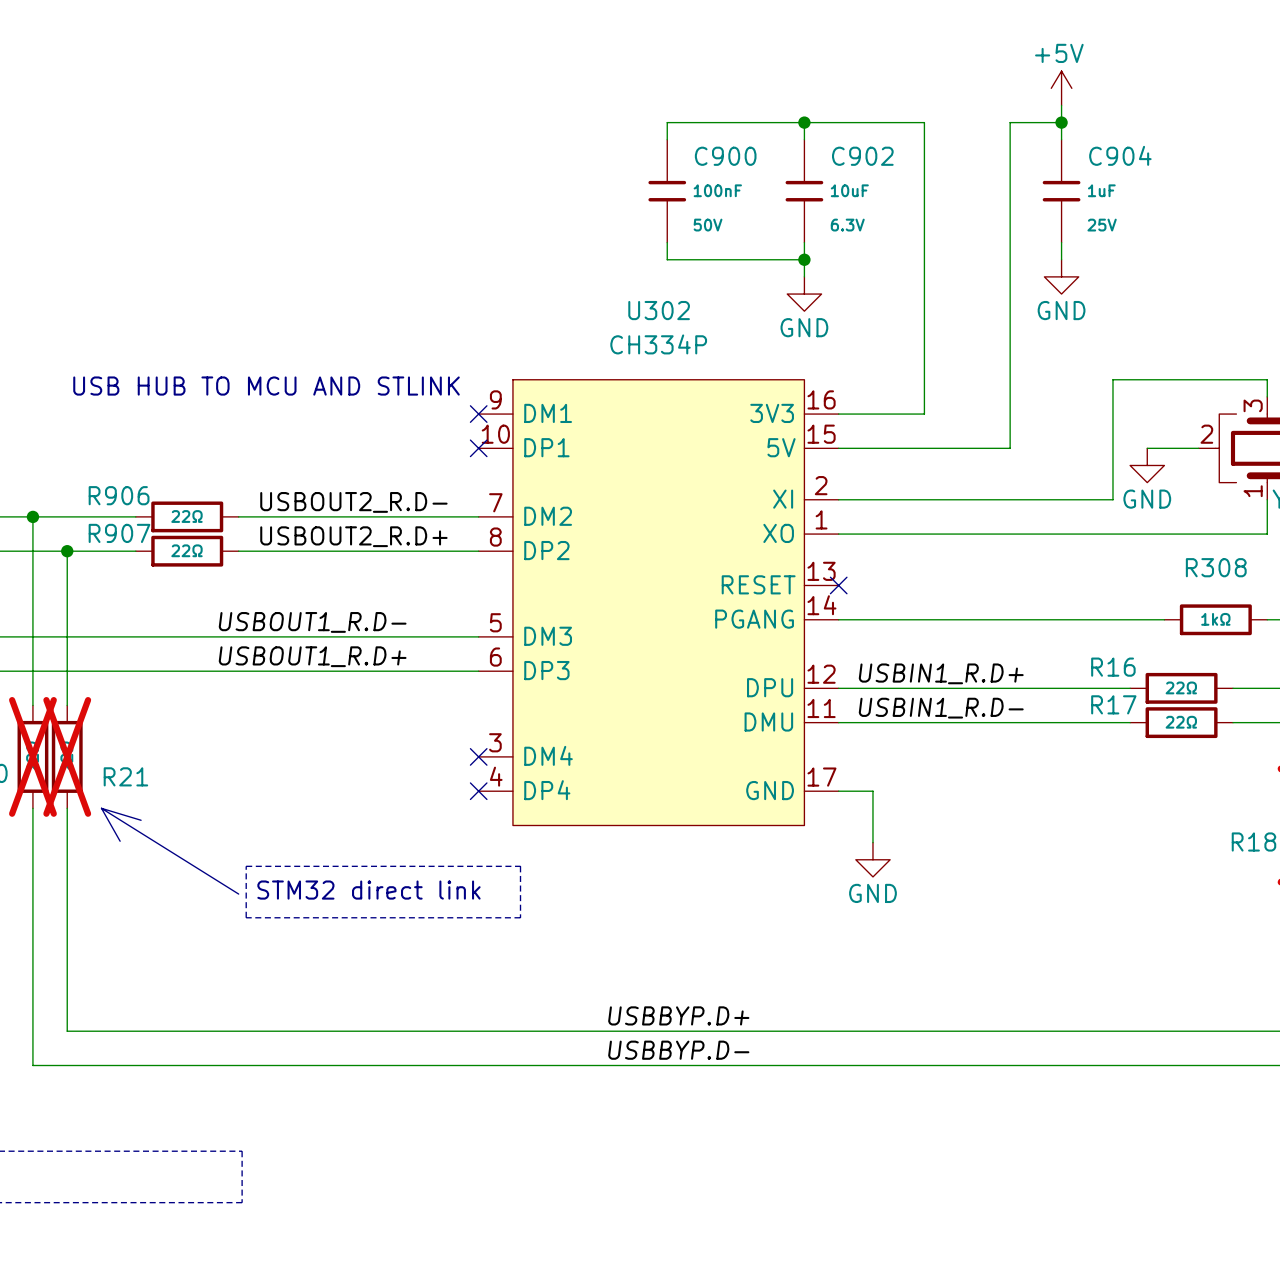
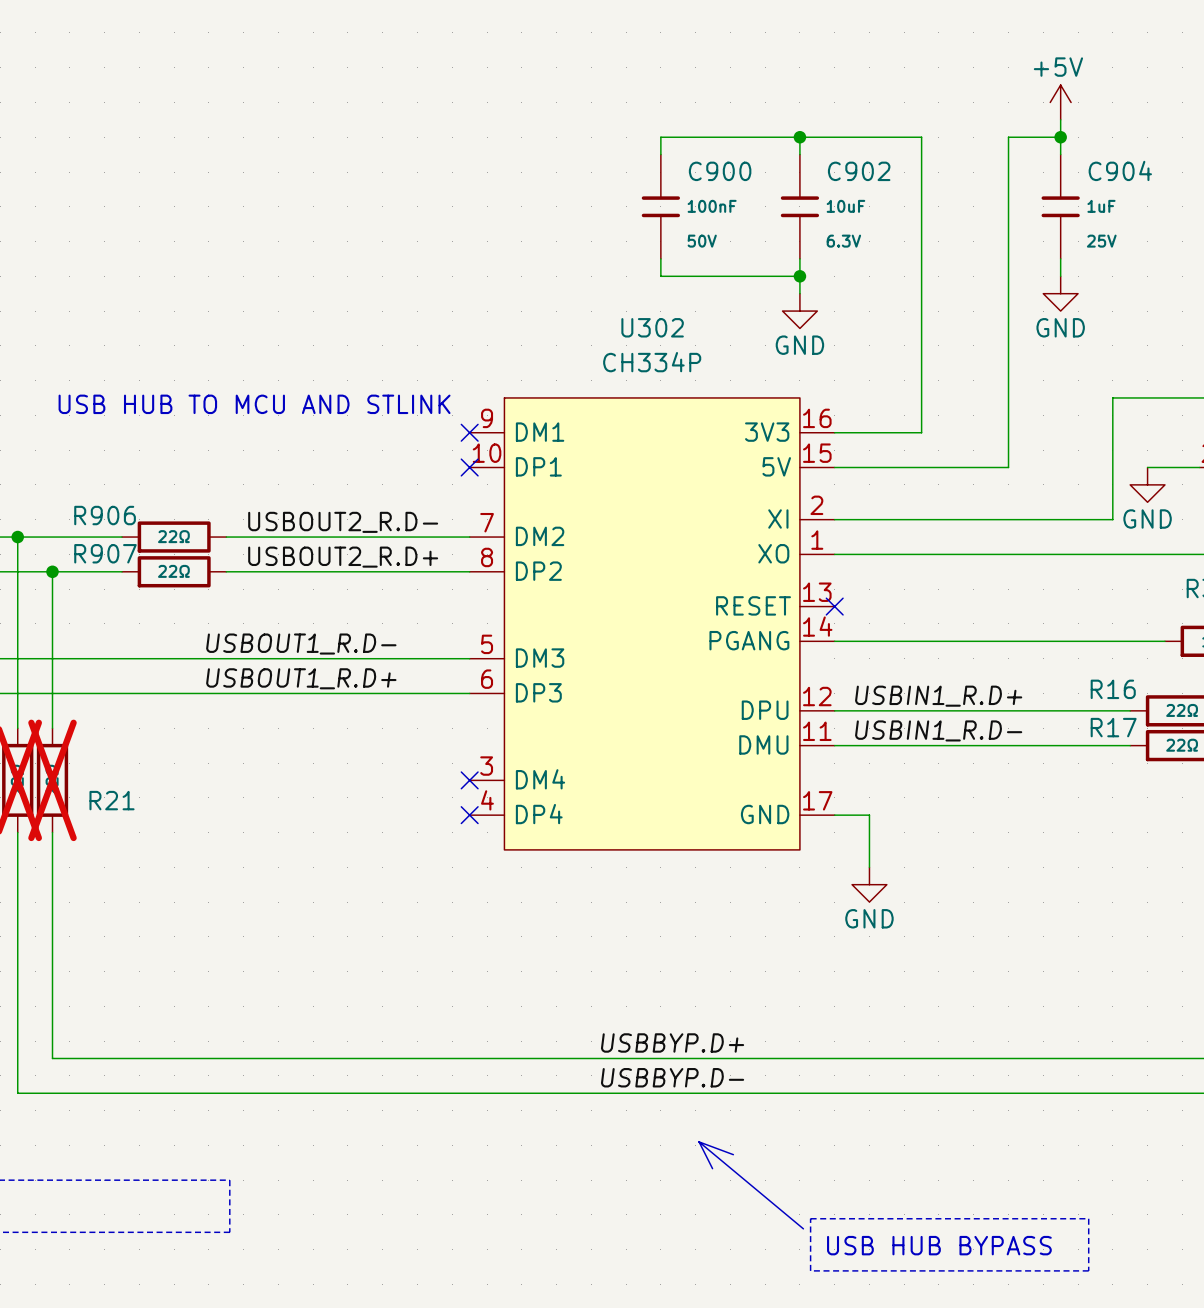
line: (101, 808) (238, 894) -> none
line: (101, 808) (141, 820) -> none
line: (101, 808) (120, 841) -> none
line: (246, 866) (520, 866) (520, 917) (246, 917) (246, 866) -> none
text: STM32 direct link (368, 890) -> none
line: none -> (699, 1141) (733, 1154)
line: none -> (699, 1141) (712, 1168)
line: none -> (699, 1141) (803, 1228)
line: none -> (810, 1218) (1088, 1218) (1088, 1270) (810, 1270) (810, 1218)
text: none -> USB HUB BYPASS (939, 1245)

